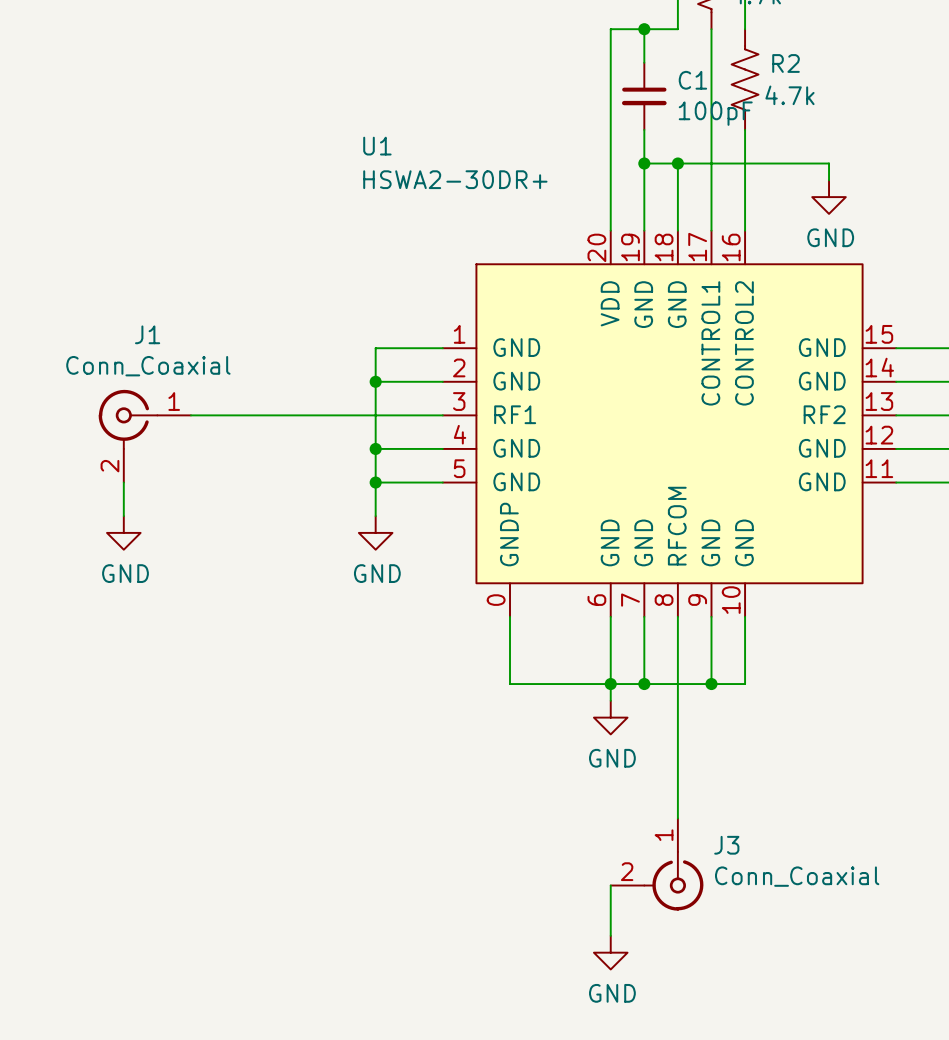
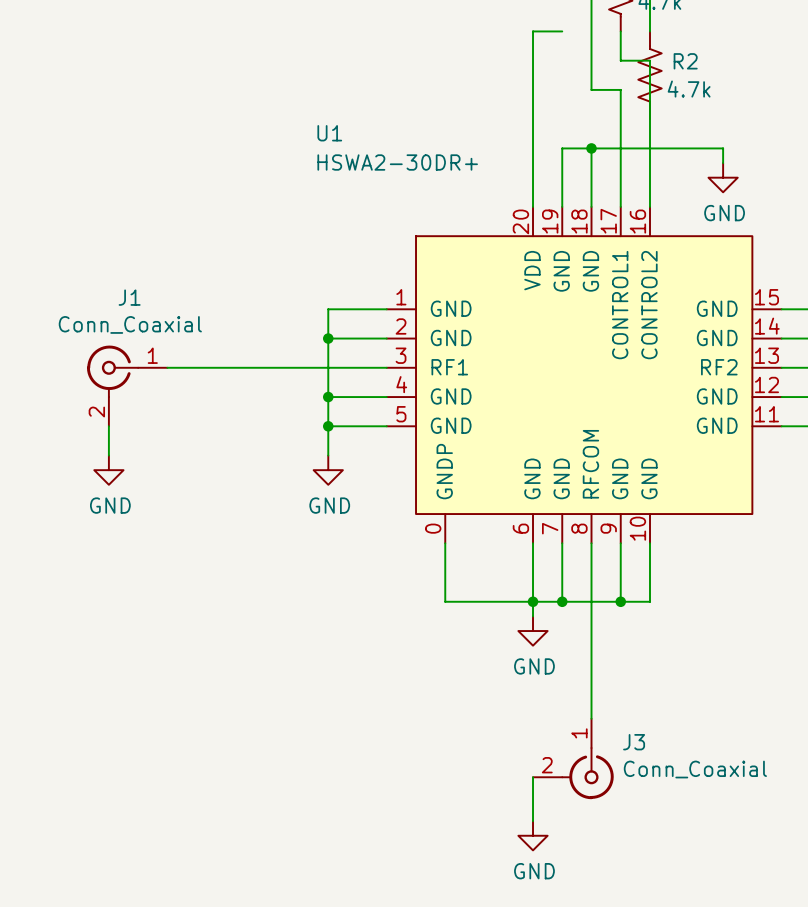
junction: (644, 29) -> none
wire: (677, 29) (644, 29) (644, 62) -> (591, 31) (591, 89) (620, 89)
wire: (711, 62) (711, 96) -> (620, 60) (649, 60) (649, 119)
C1: 100pF (644, 96) -> none
wire: (644, 129) (644, 163) -> none
junction: (644, 163) -> none

